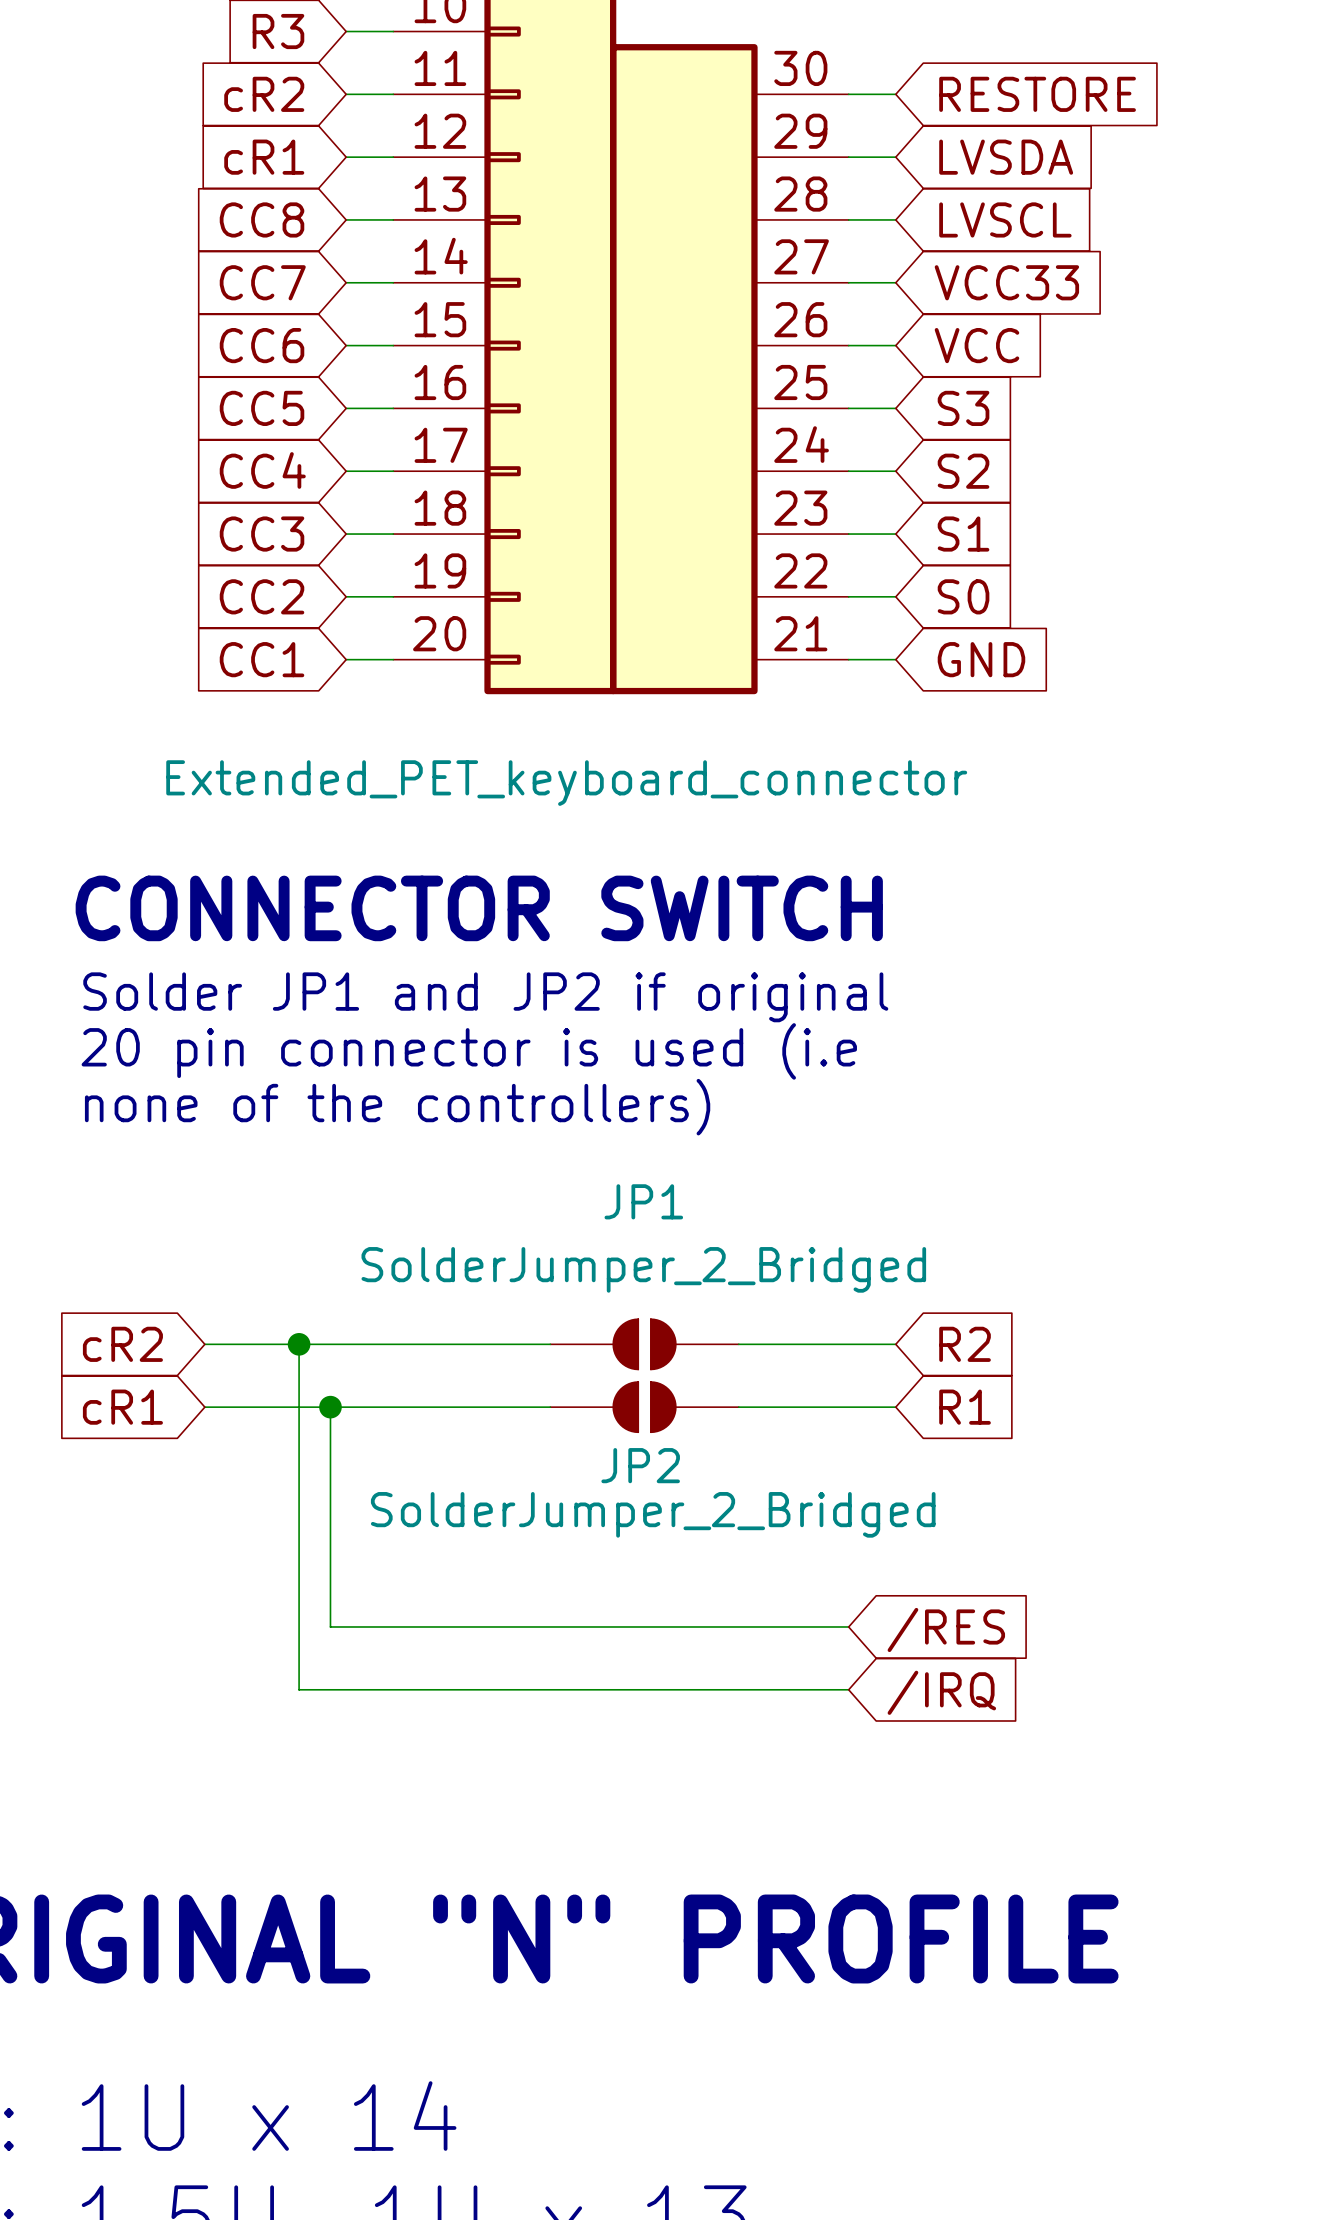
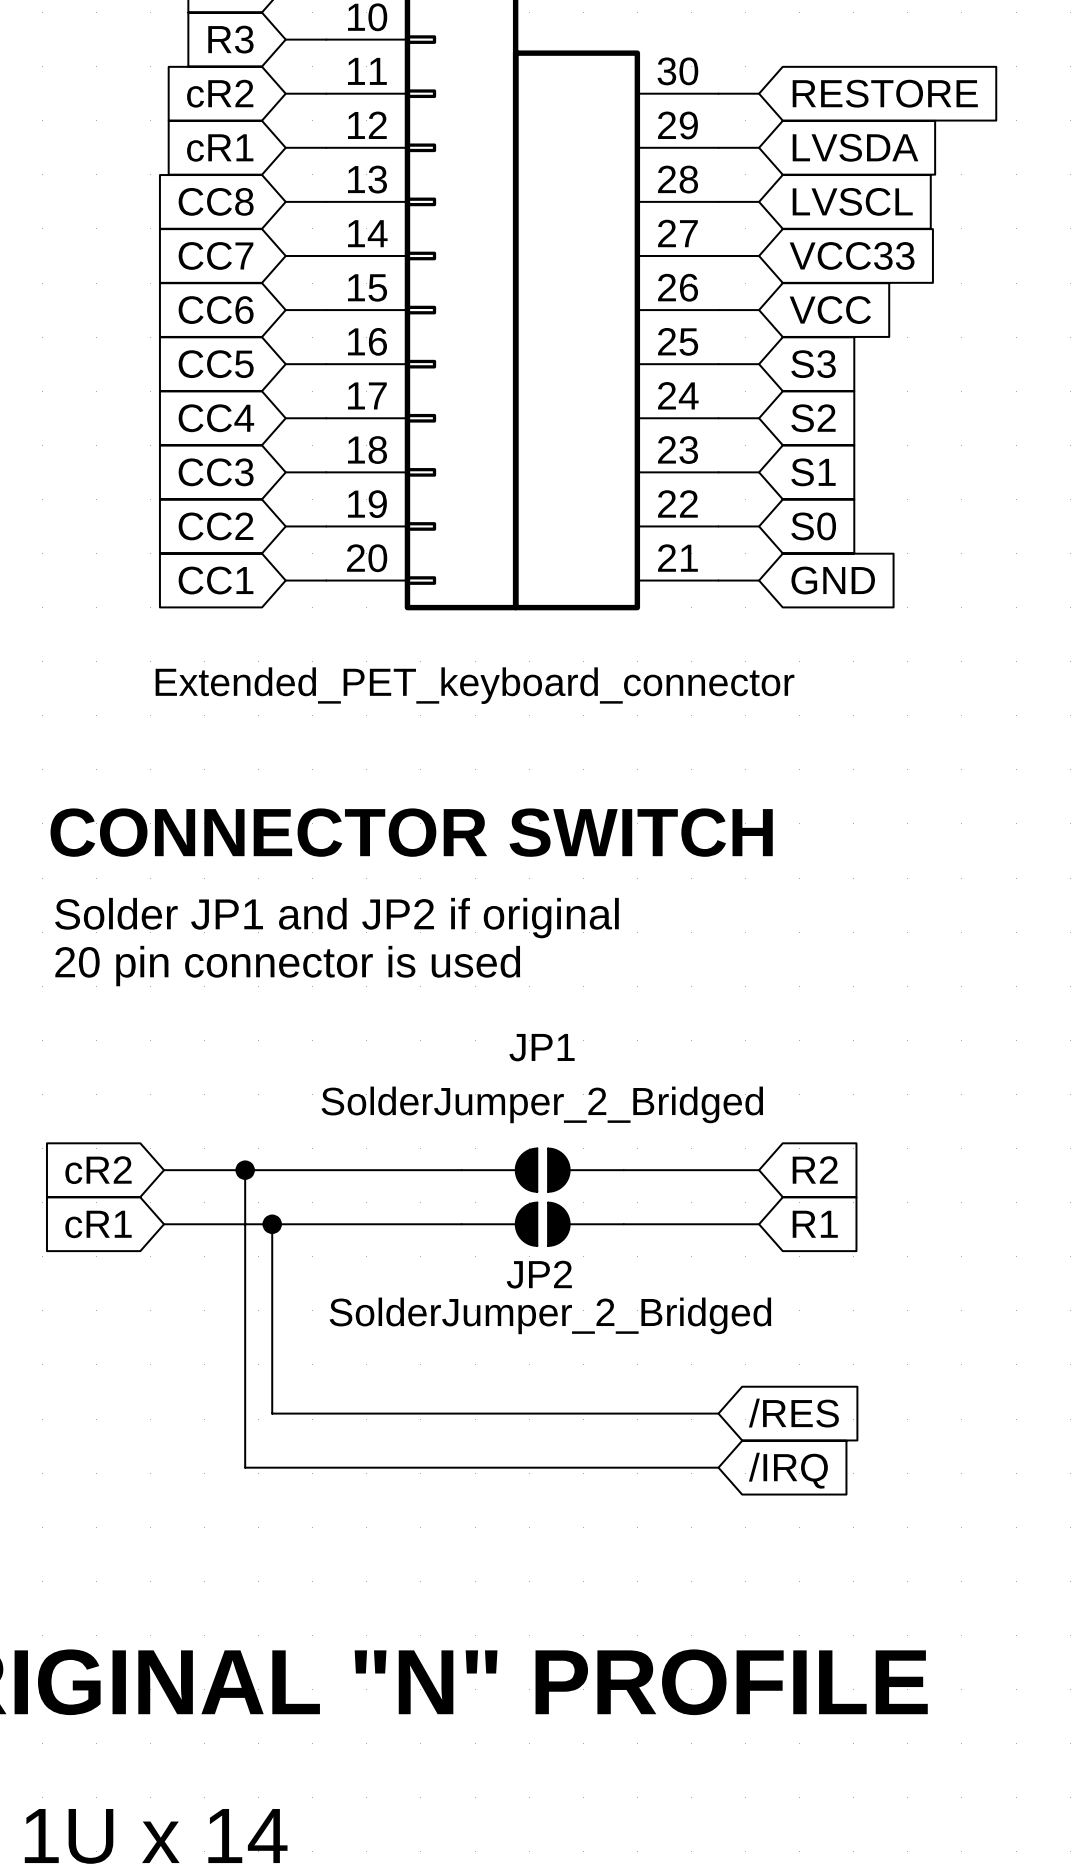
text position: CONNECTOR SWITCH (479, 908) -> CONNECTOR SWITCH (411, 832)
text: Solder JP1 and JP2 if original (485, 997) -> none
text: 20 pin connector is used (i.e (469, 1051) -> Solder JP1 and JP2 if original (336, 918)
text: none of the controllers) (397, 1107) -> 20 pin connector is used (287, 966)

